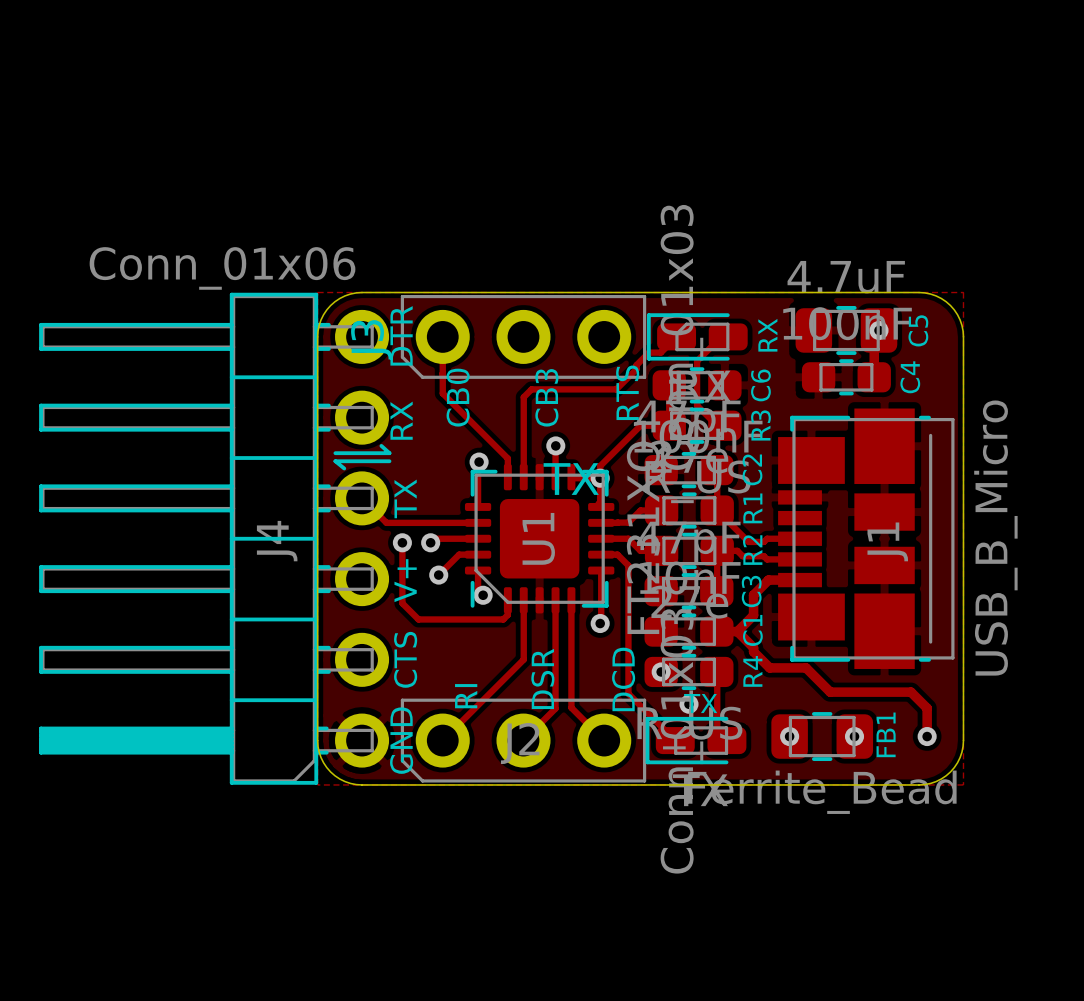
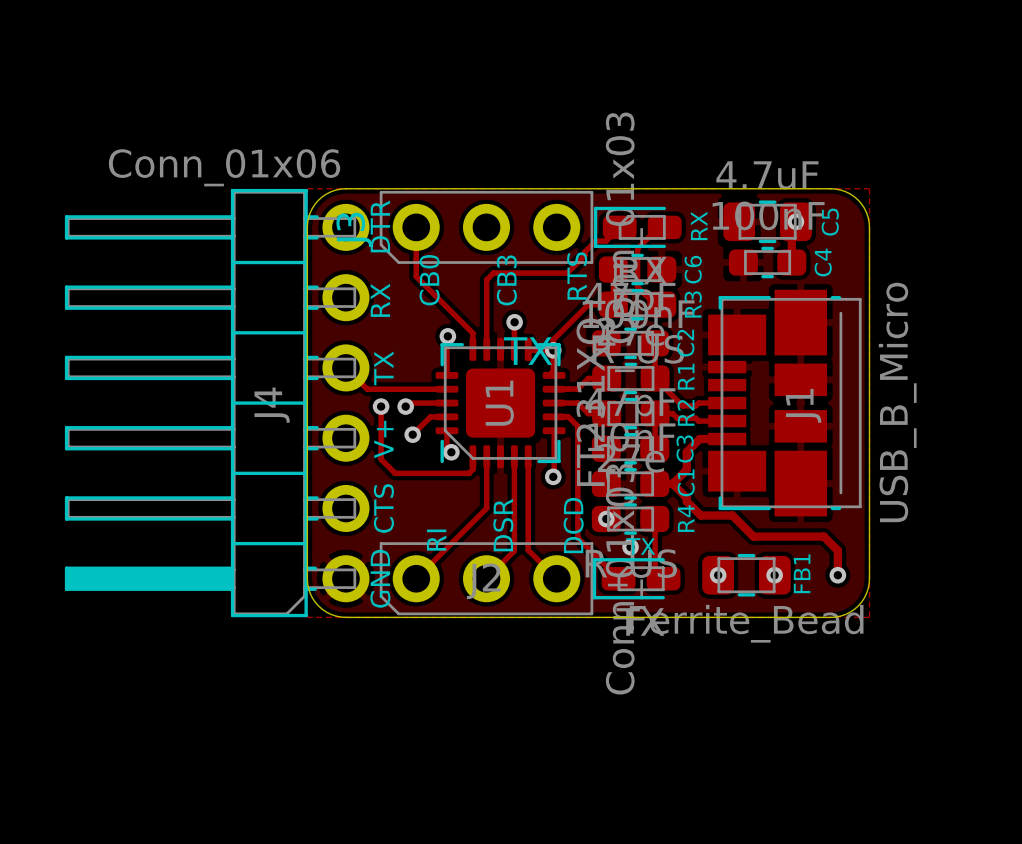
line: (381, 445) (389, 453) (335, 453) -> none
line: (389, 461) (335, 461) (344, 468) -> none

